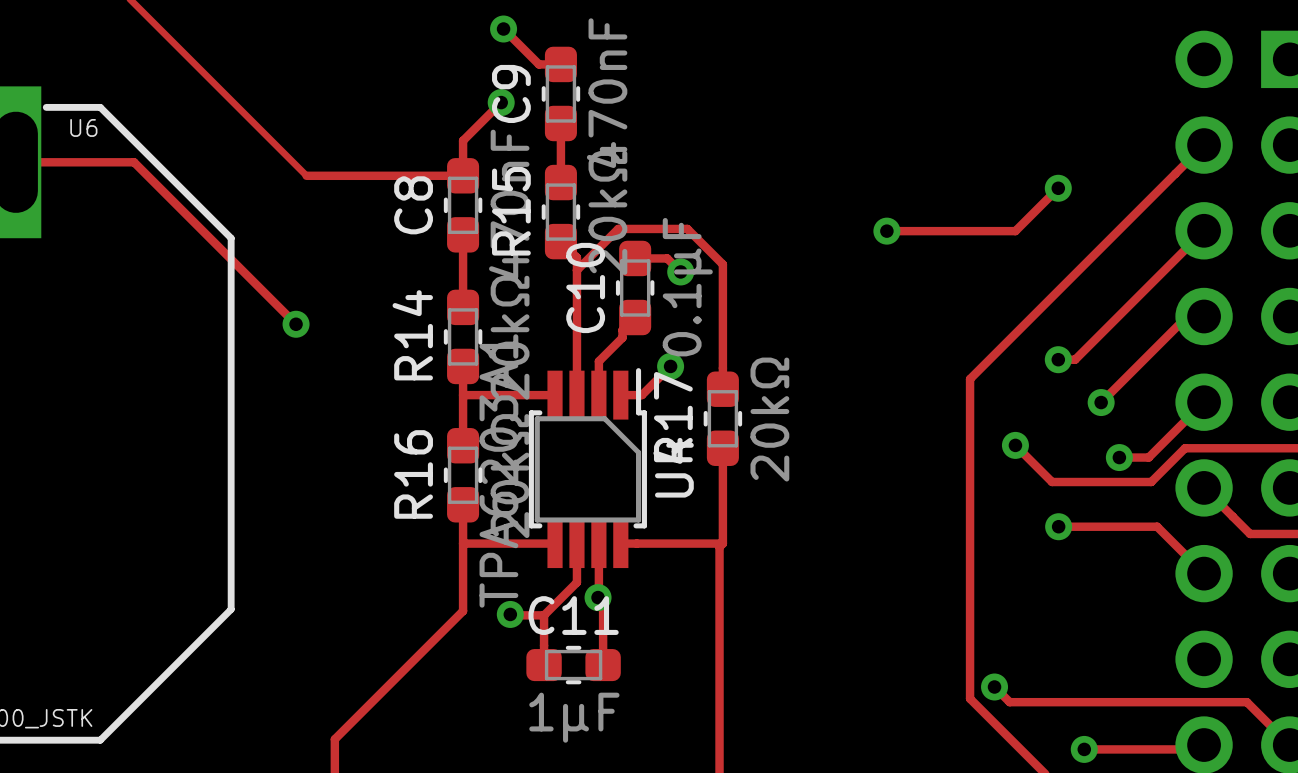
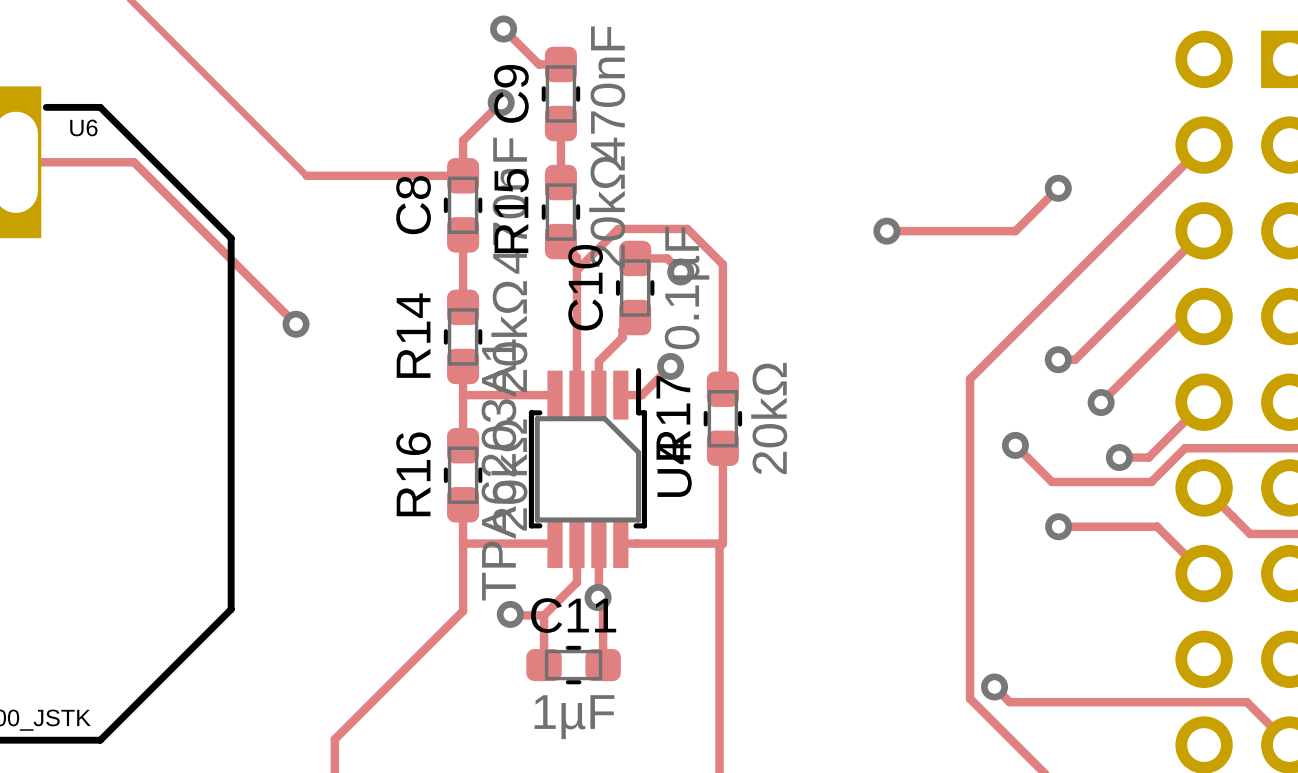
track: (1204, 745) (1199, 749) (1084, 749) -> none
via: (1084, 749) -> none

